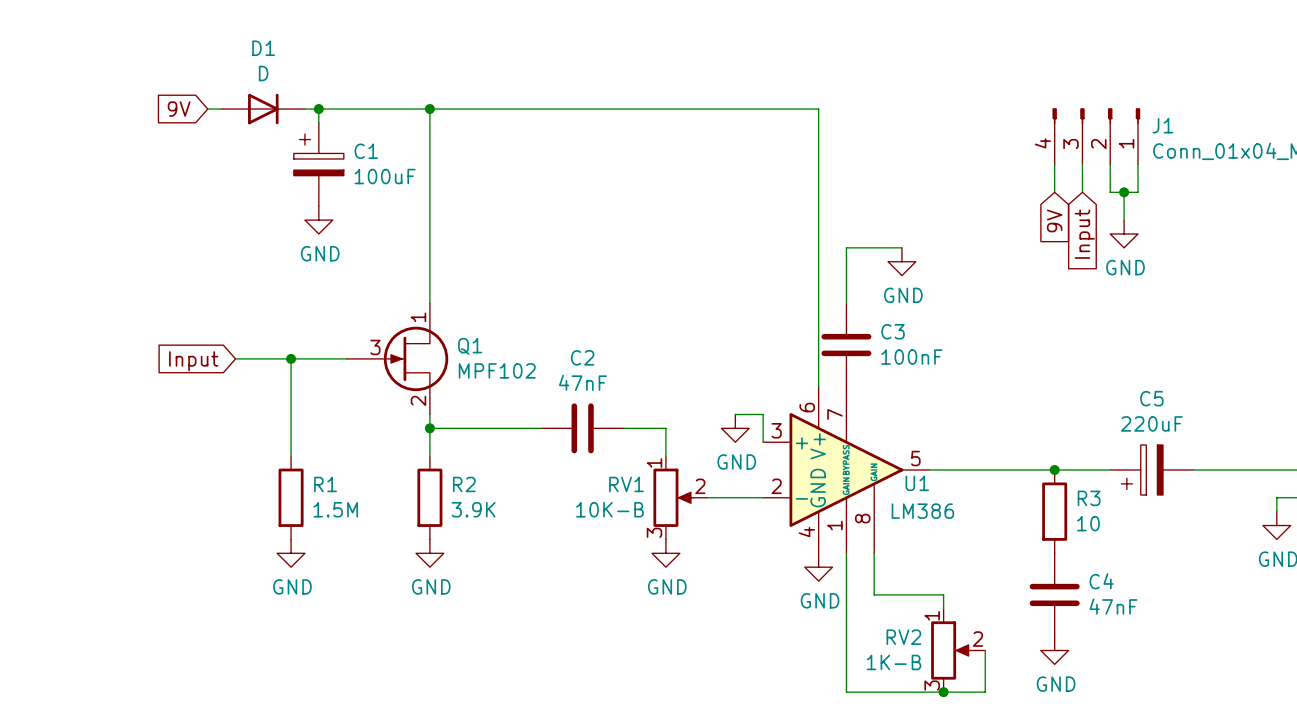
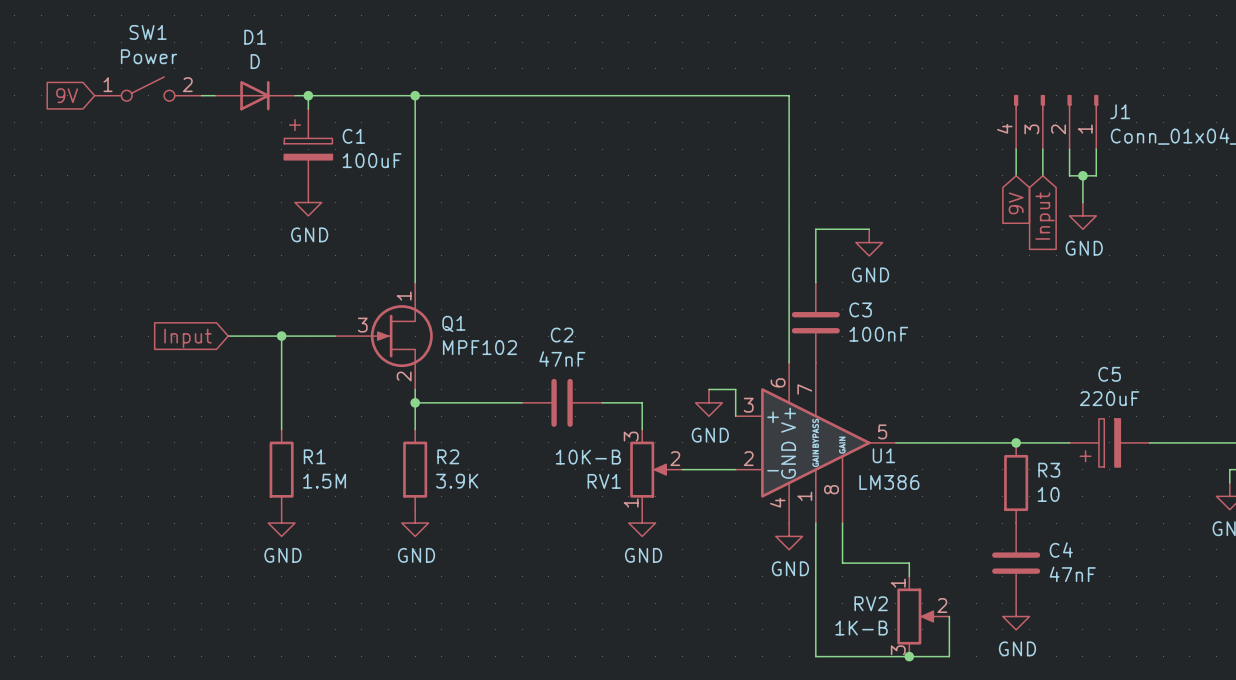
SW1: none -> Power (148, 89)
global label position: 9V (179, 109) -> 9V (67, 95)
RV1 flip: as is (673, 497) -> up-down (649, 469)

